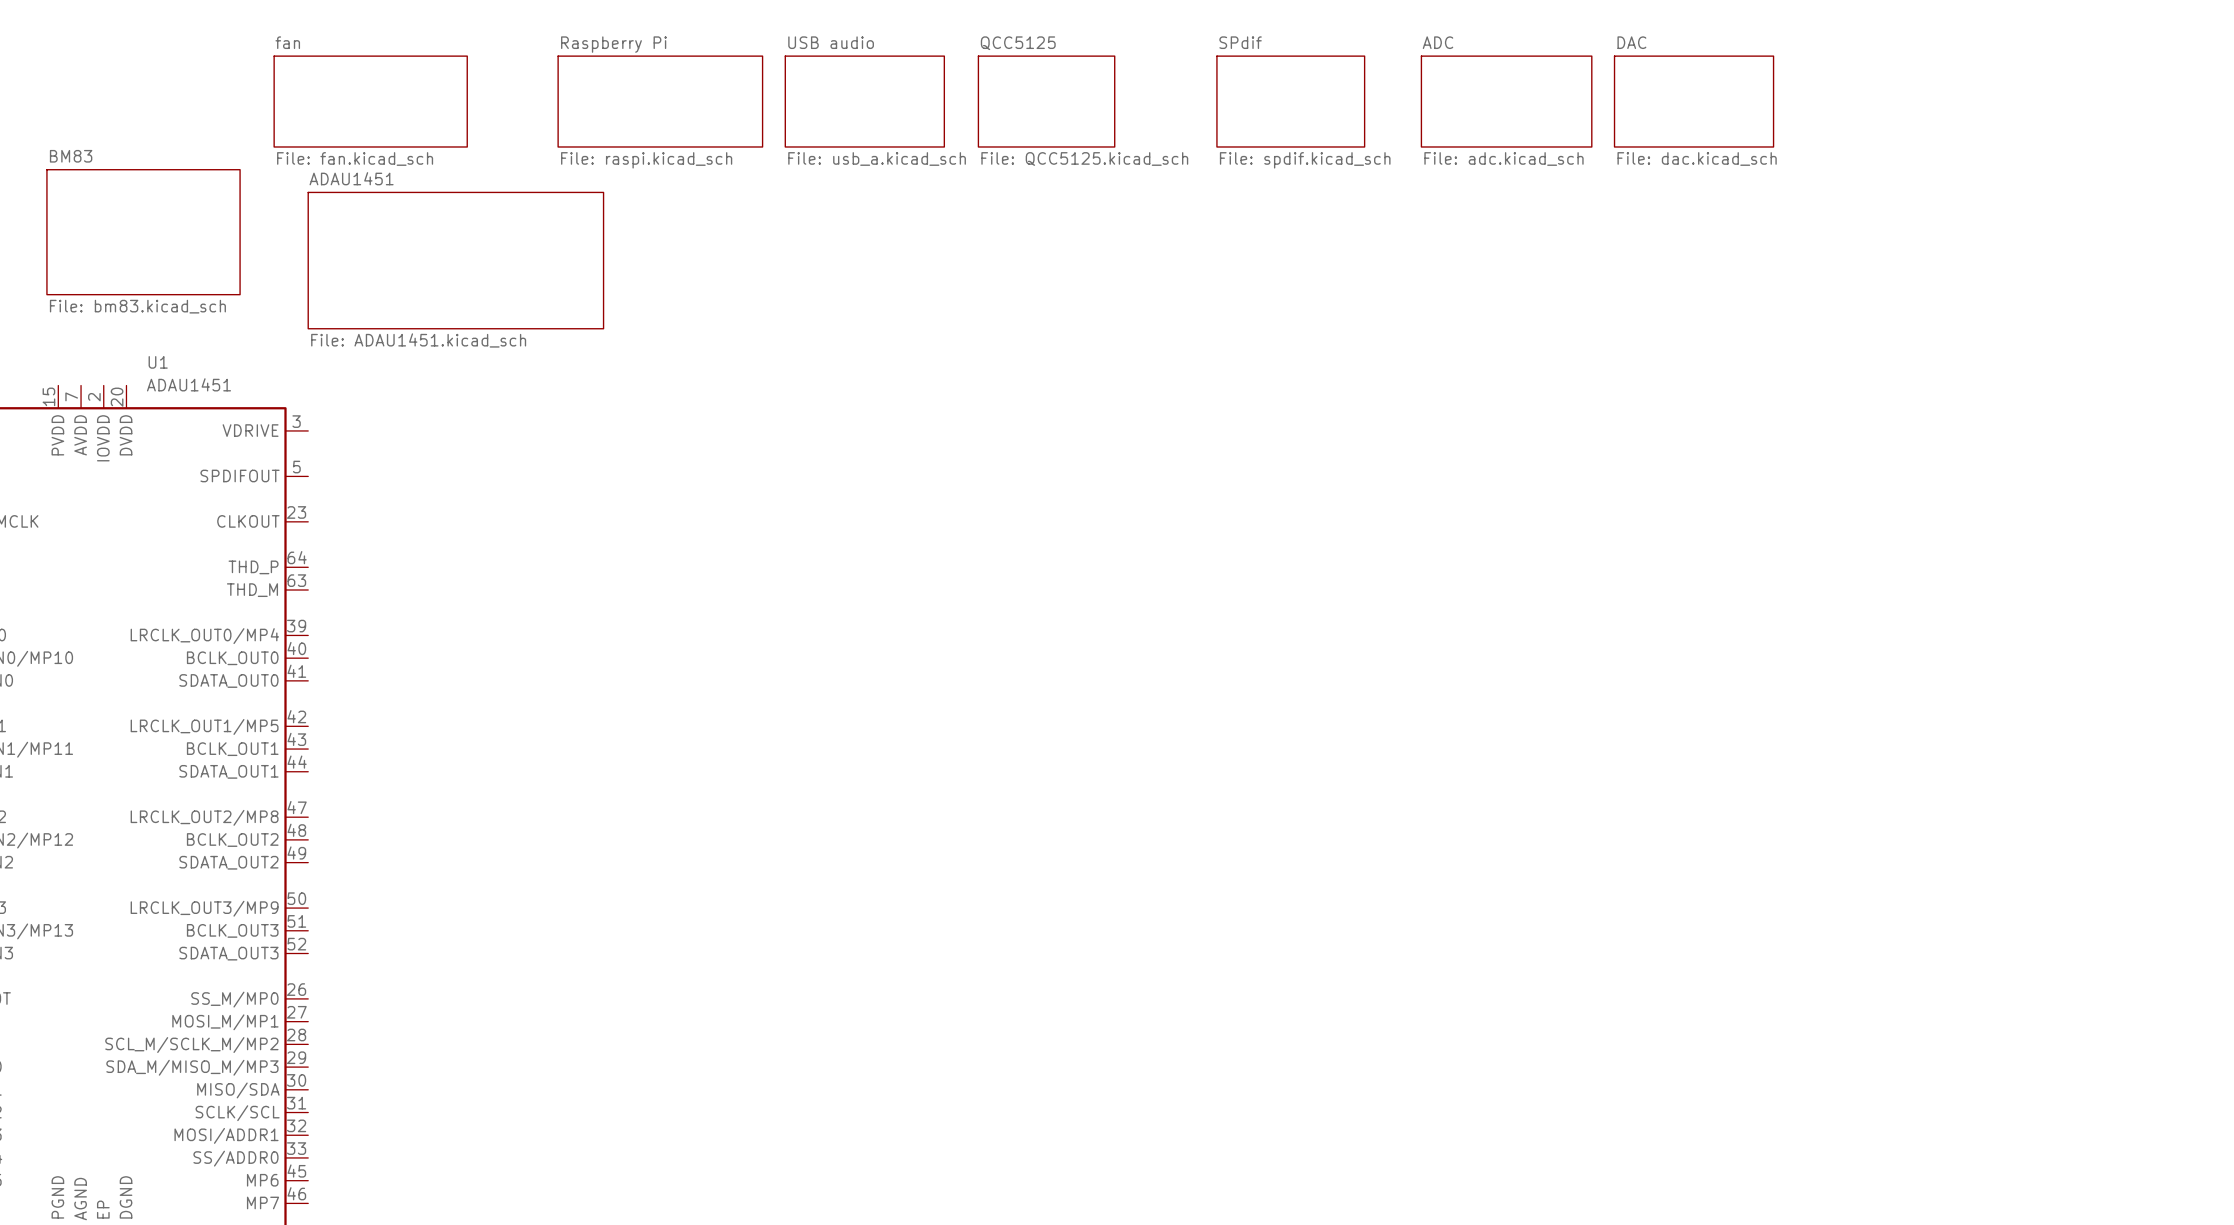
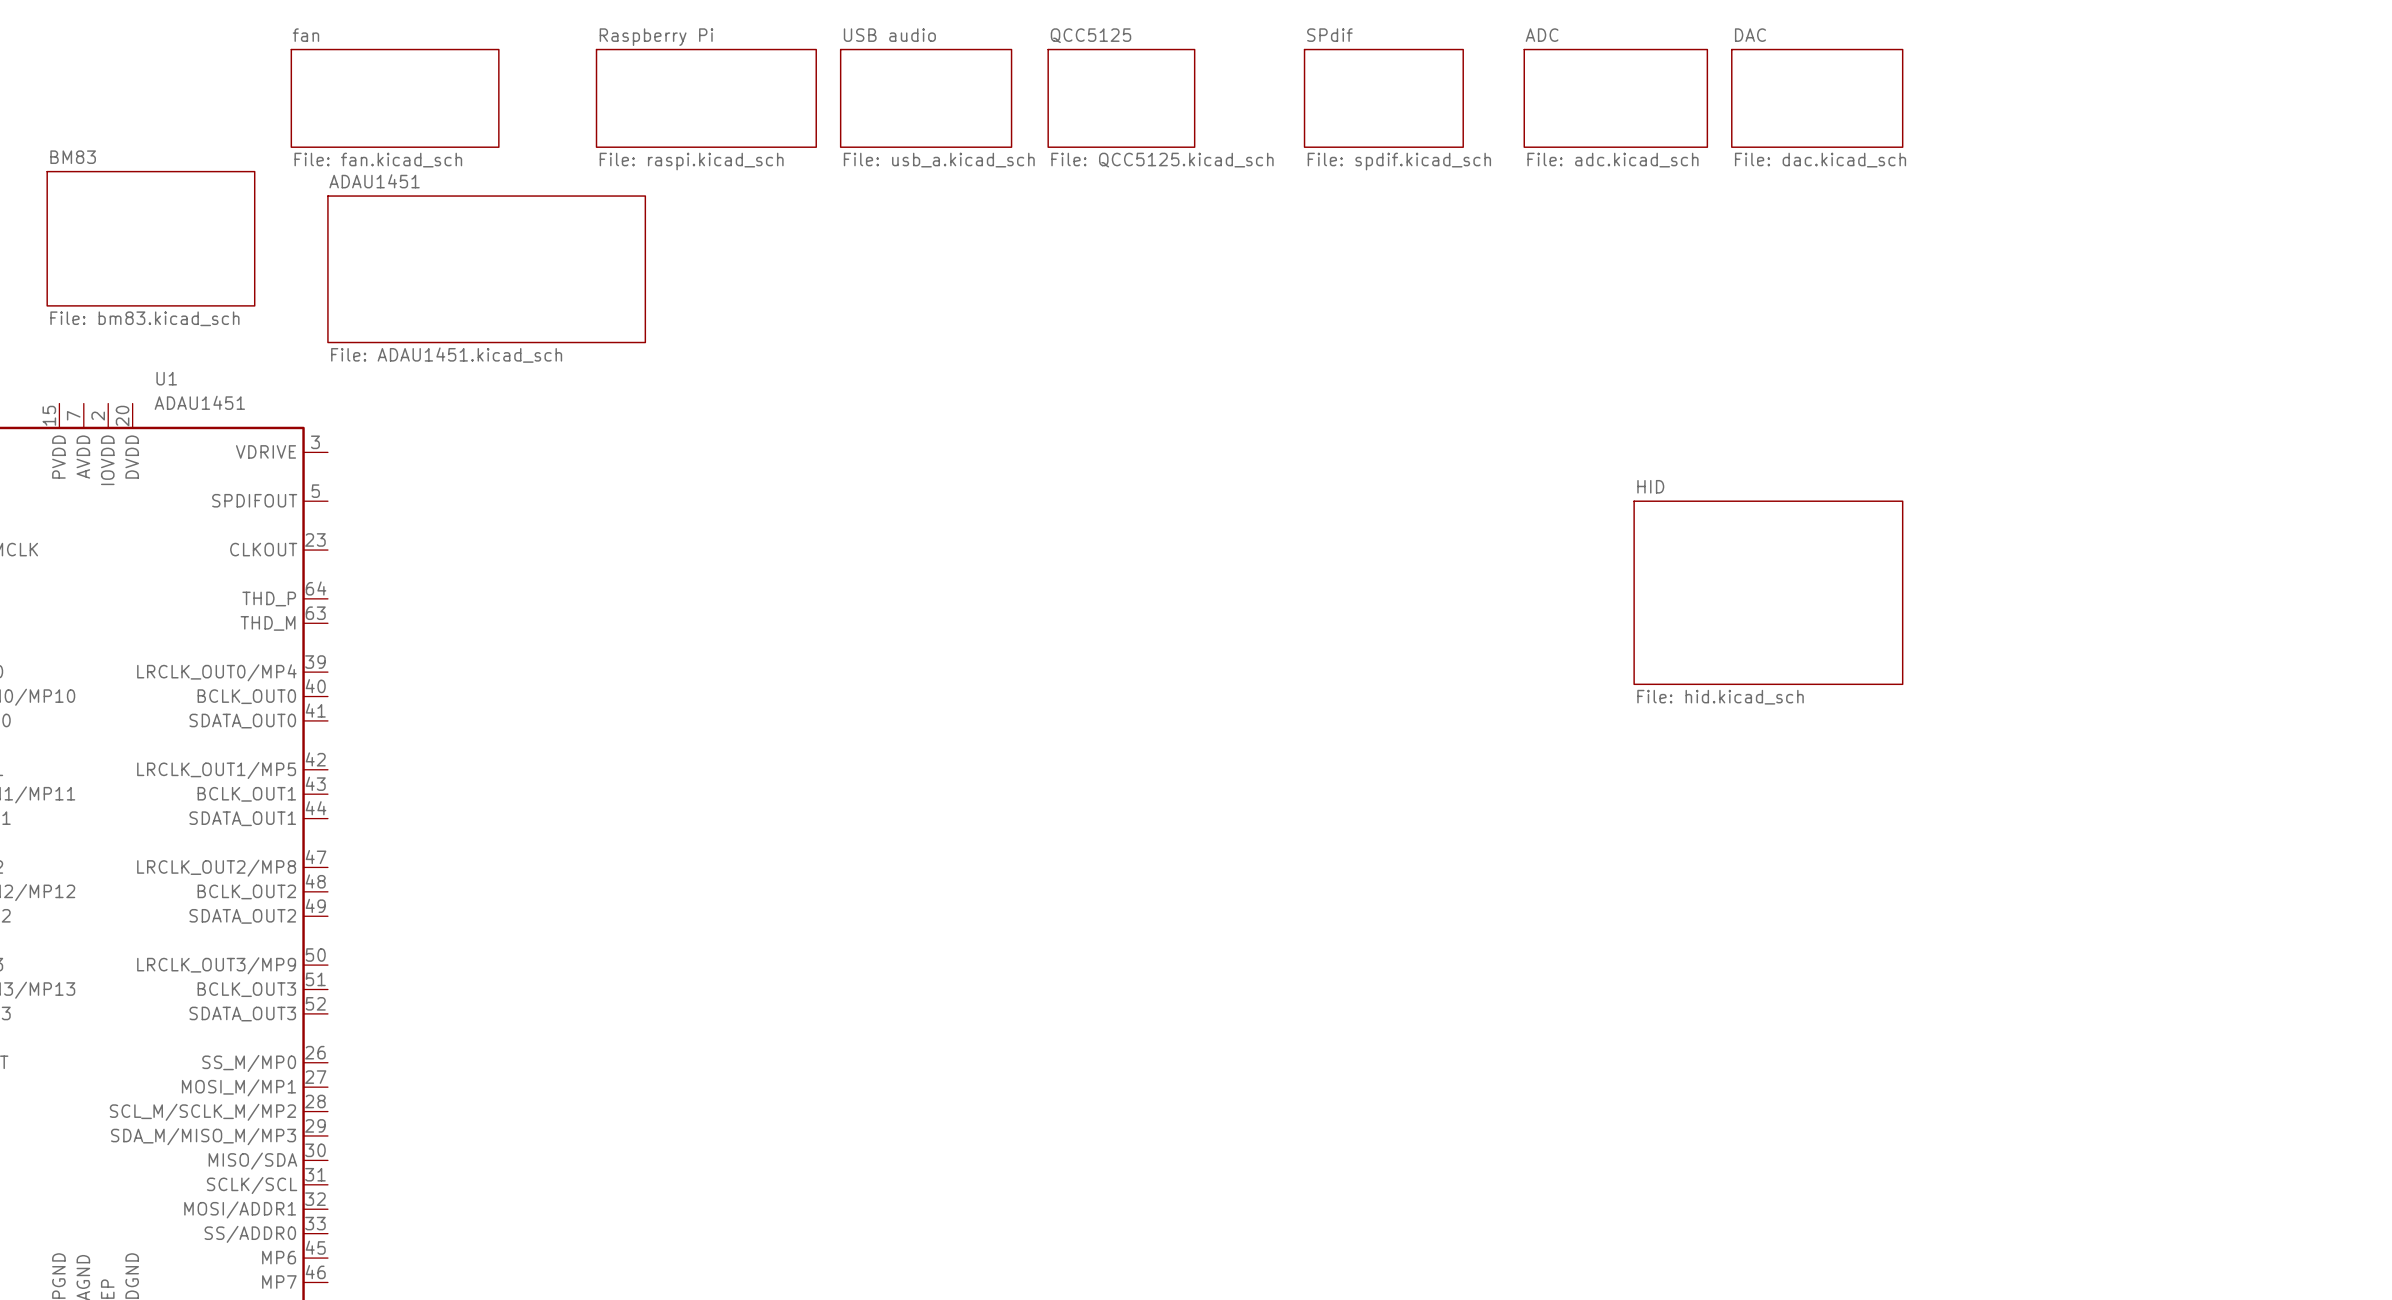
sheet HID: none -> File: hid.kicad_sch (1768, 592)

